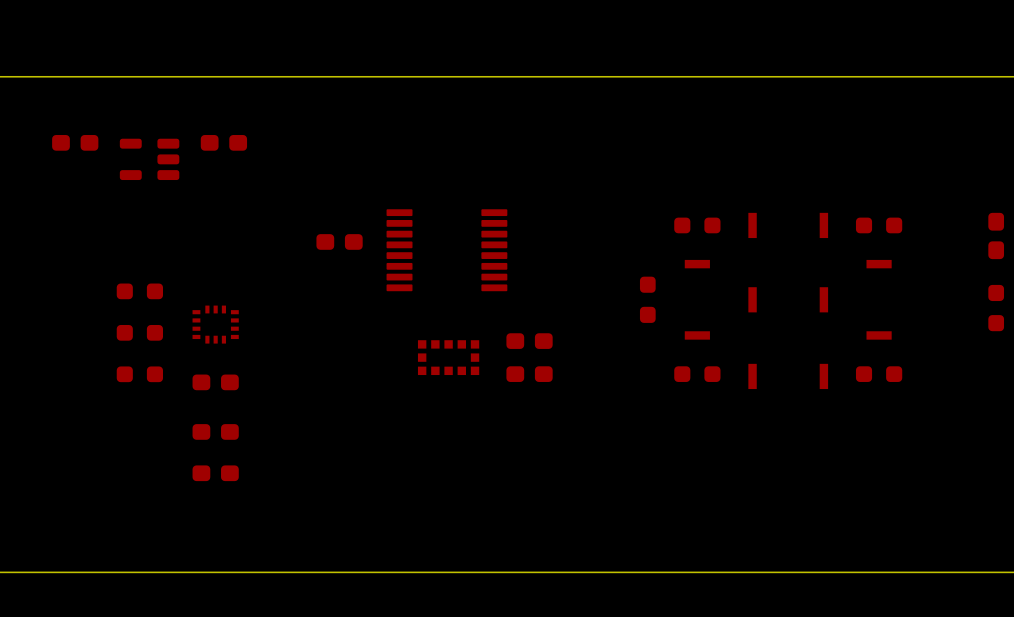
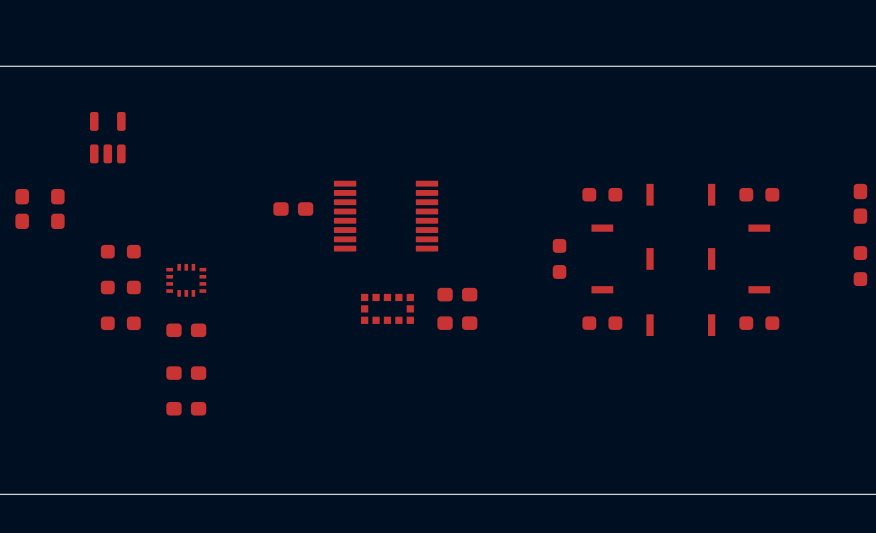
part: (75, 142) -> none
part: (223, 142) -> none
part rotation: 0° (149, 159) -> 90° clockwise (107, 137)
part: none -> (22, 209)
part: none -> (57, 209)

